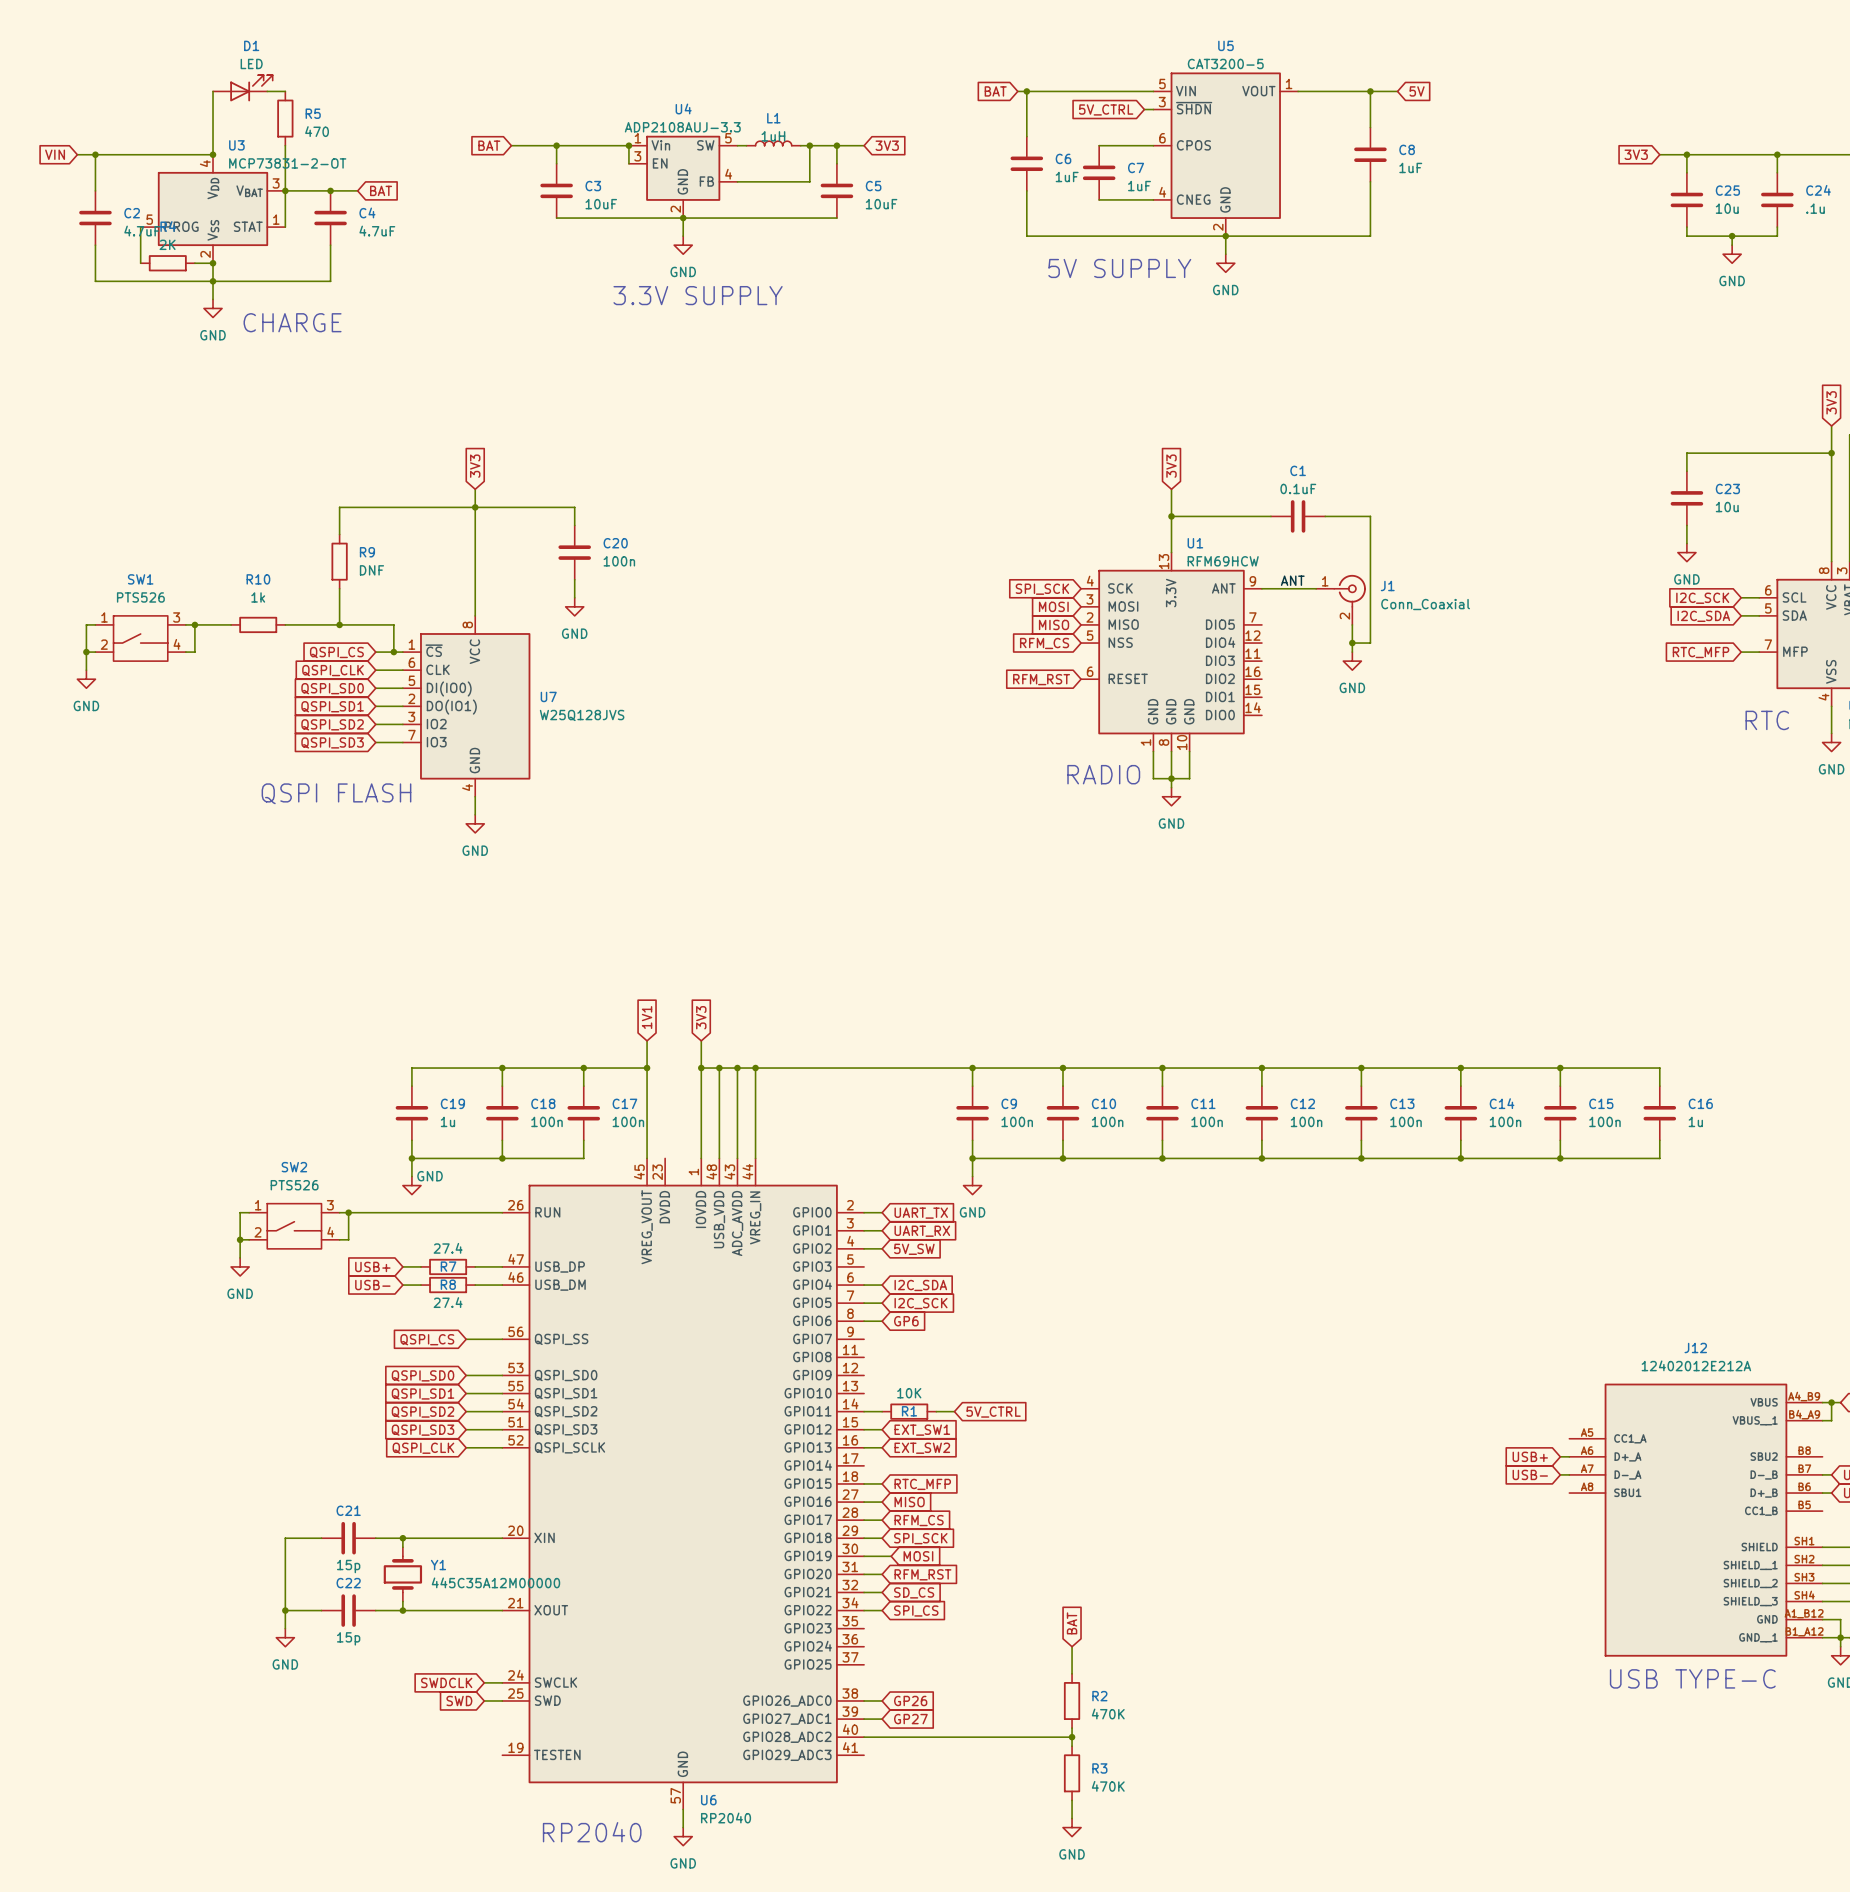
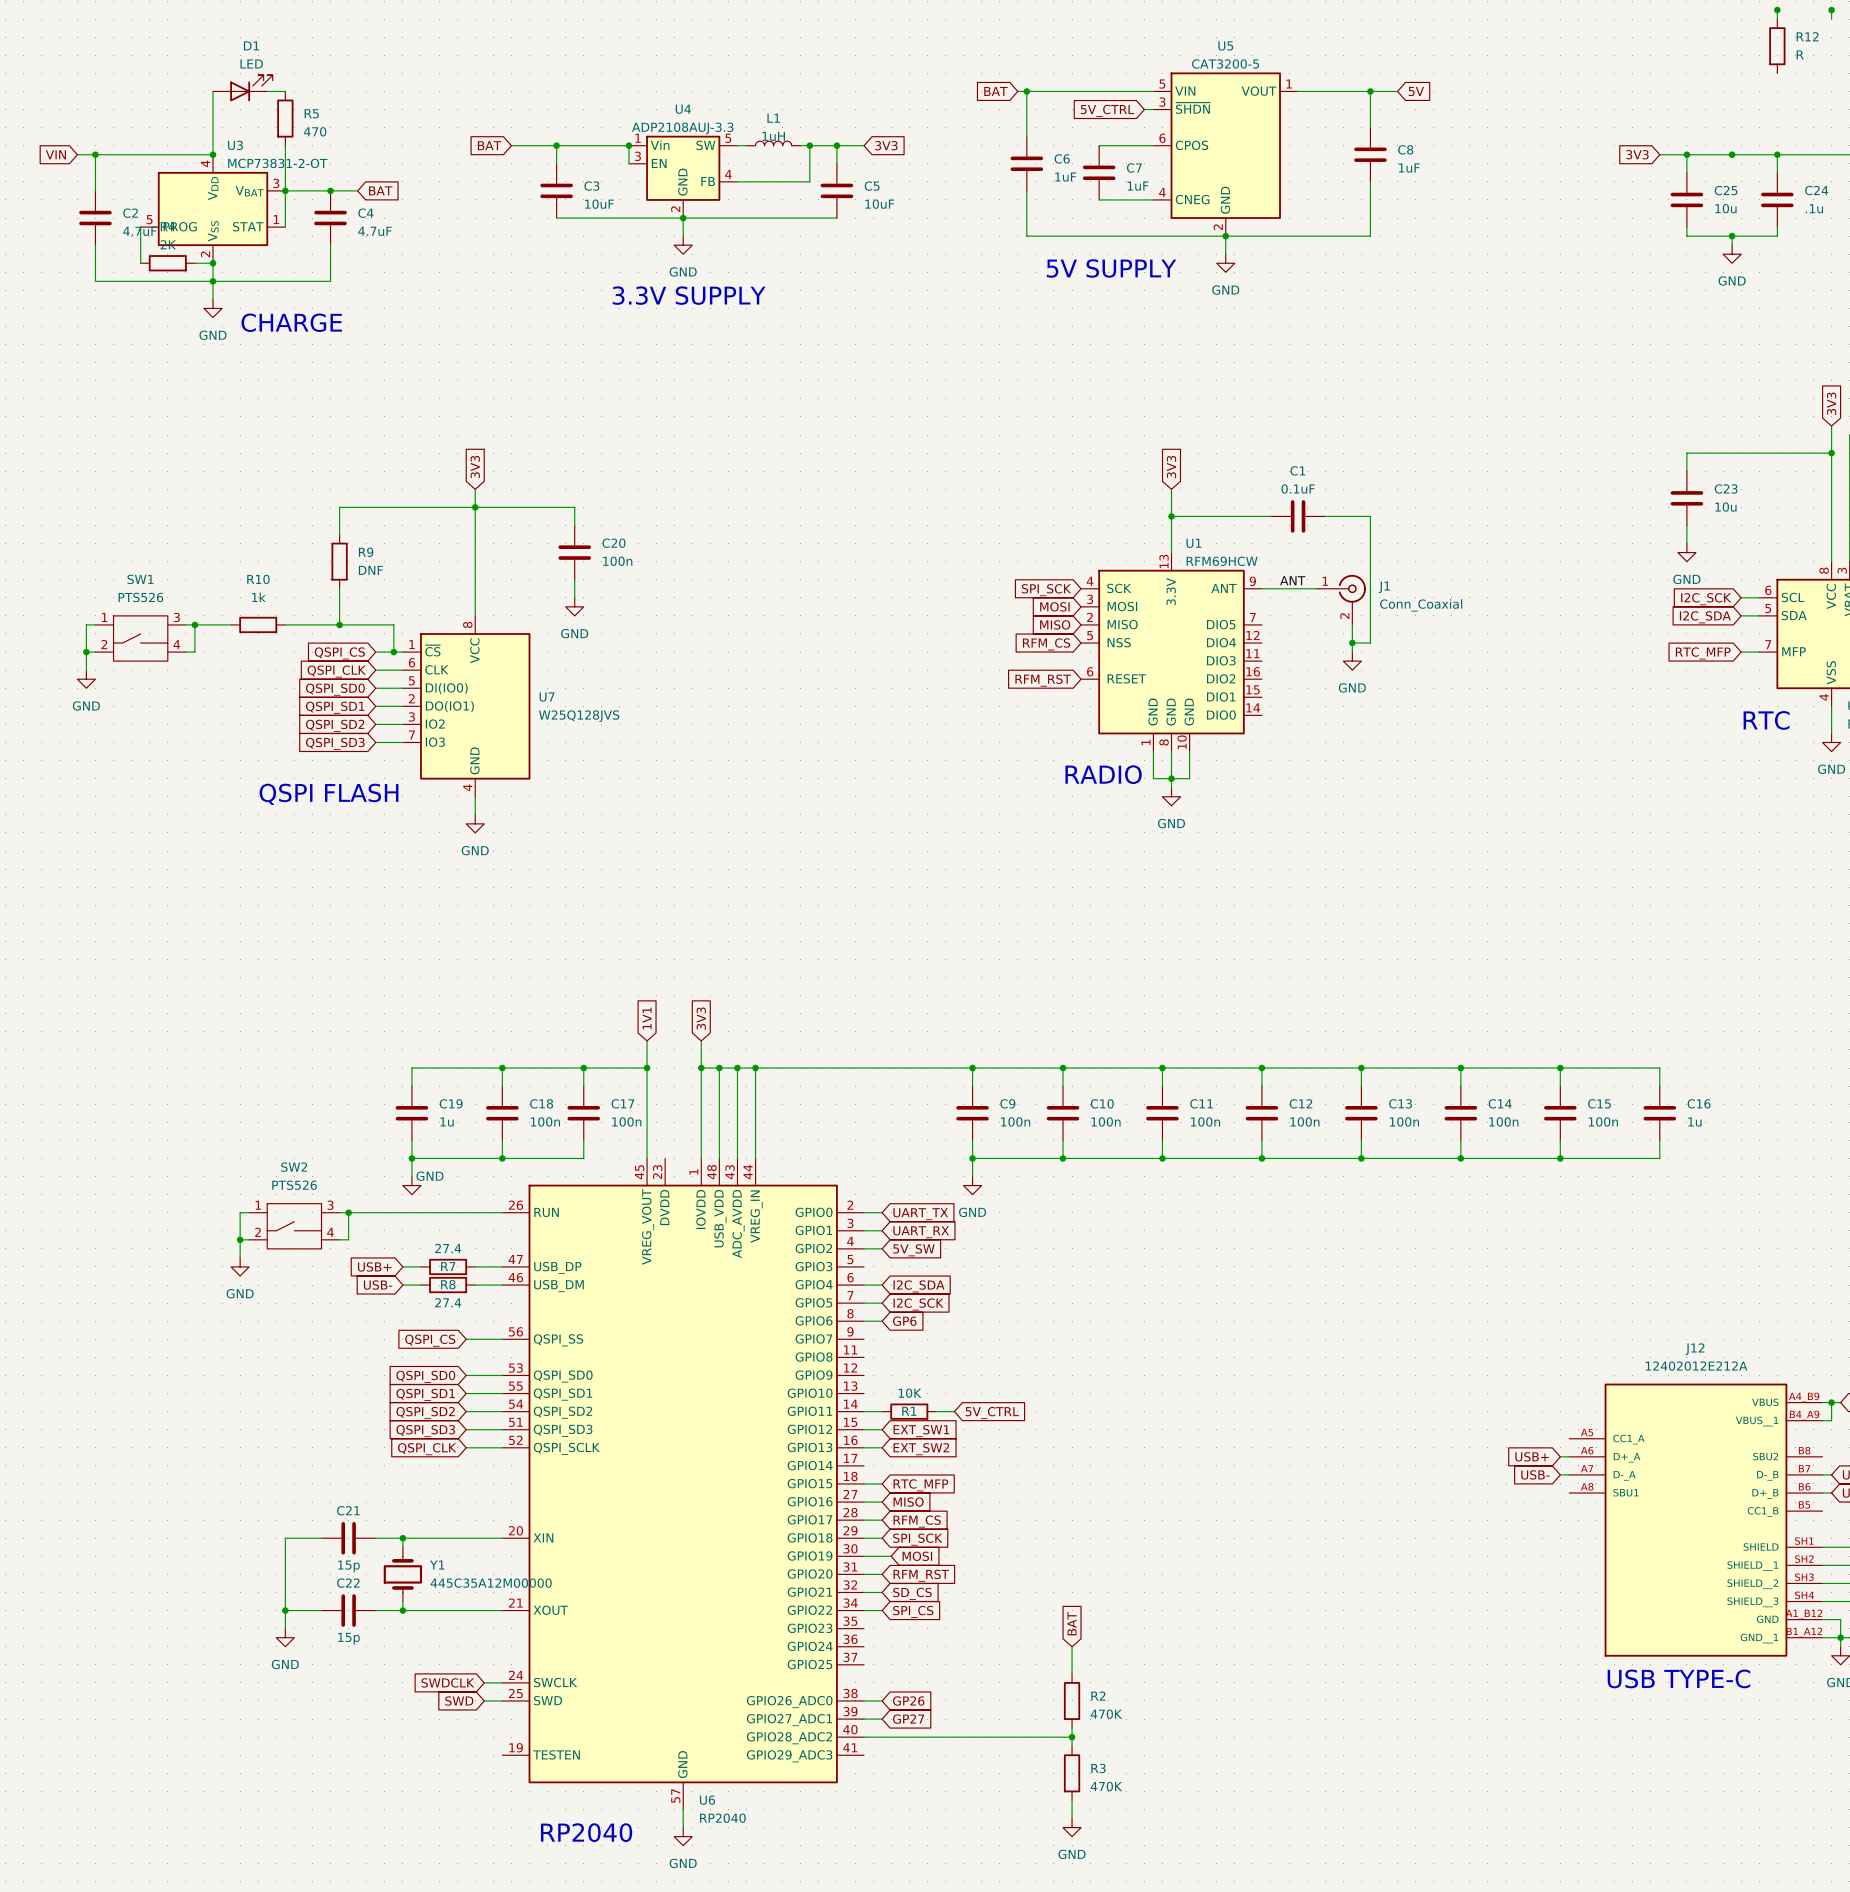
wire: none -> (1777, 10) (1777, 19)
junction: none -> (1777, 10)
wire: none -> (1831, 10) (1831, 19)
junction: none -> (1831, 10)
R12: none -> R (1777, 46)
junction: none -> (1732, 154)

